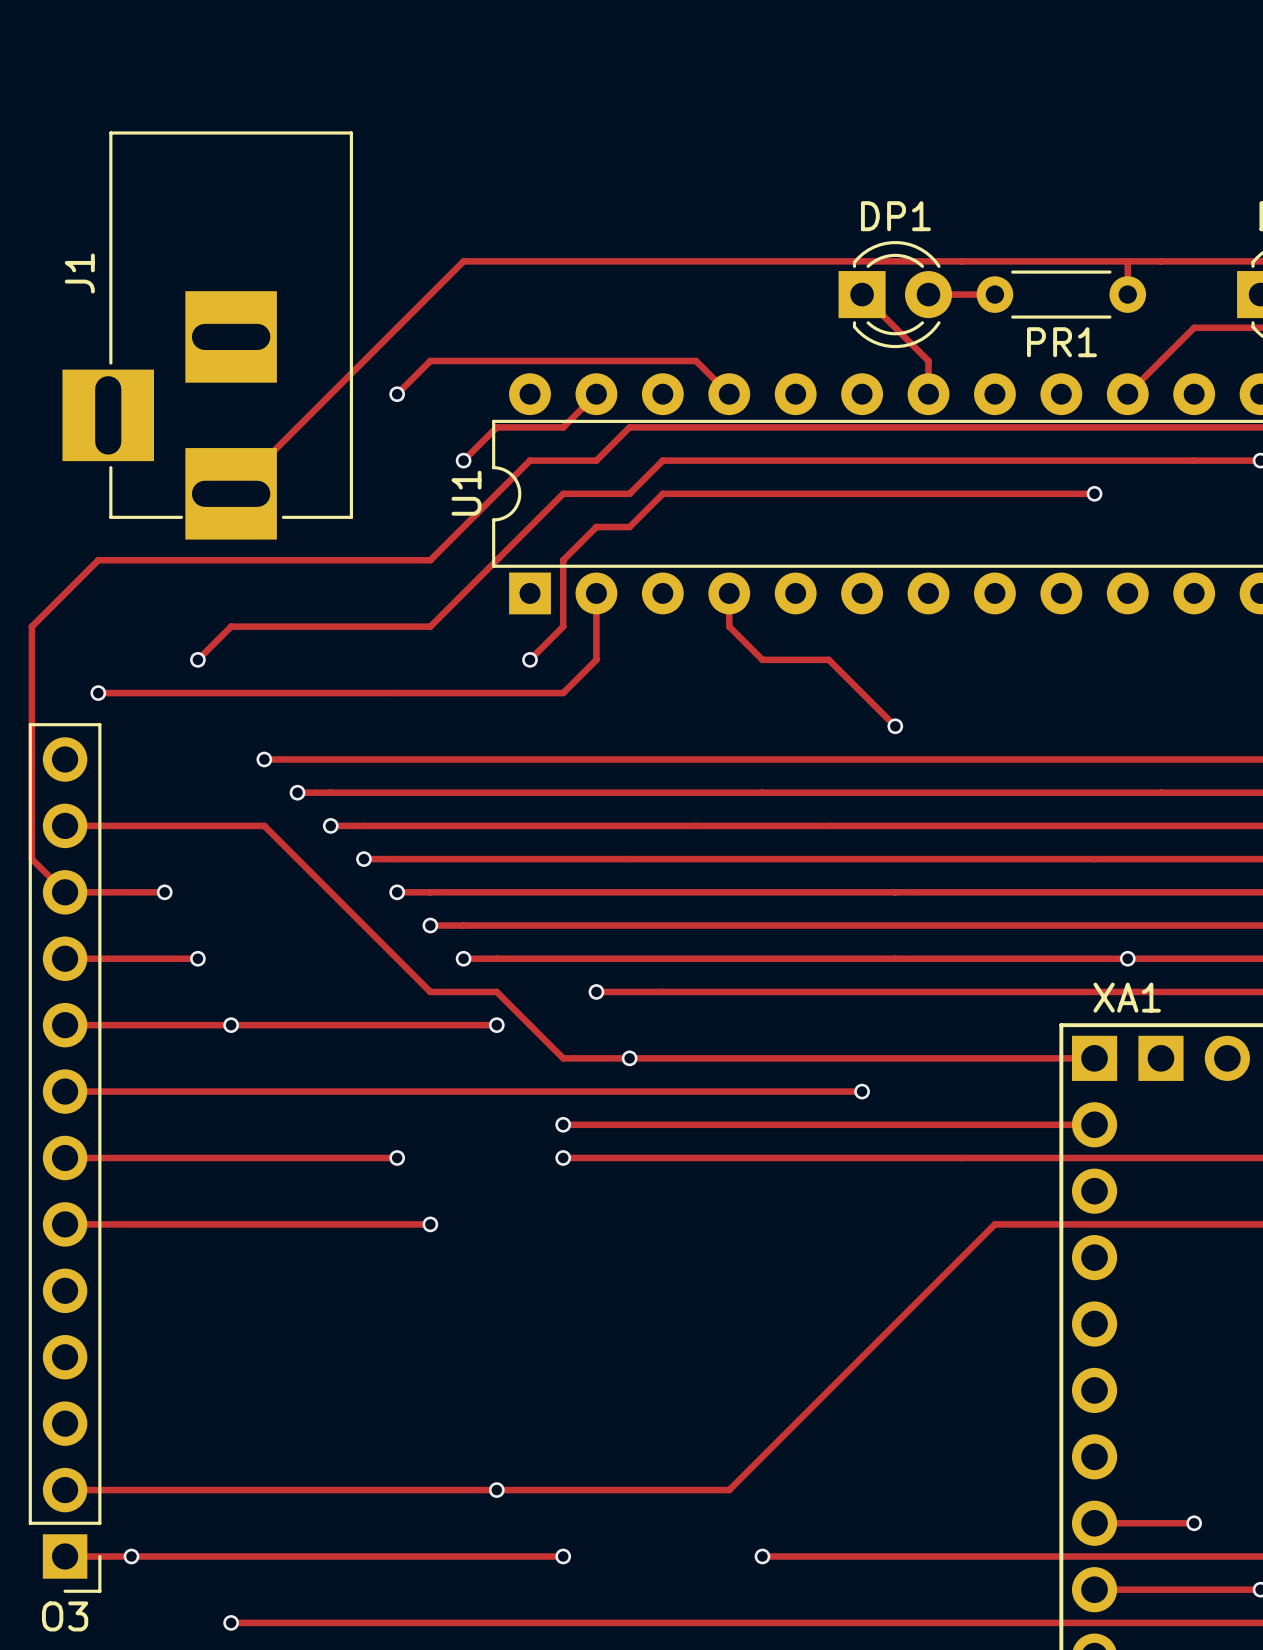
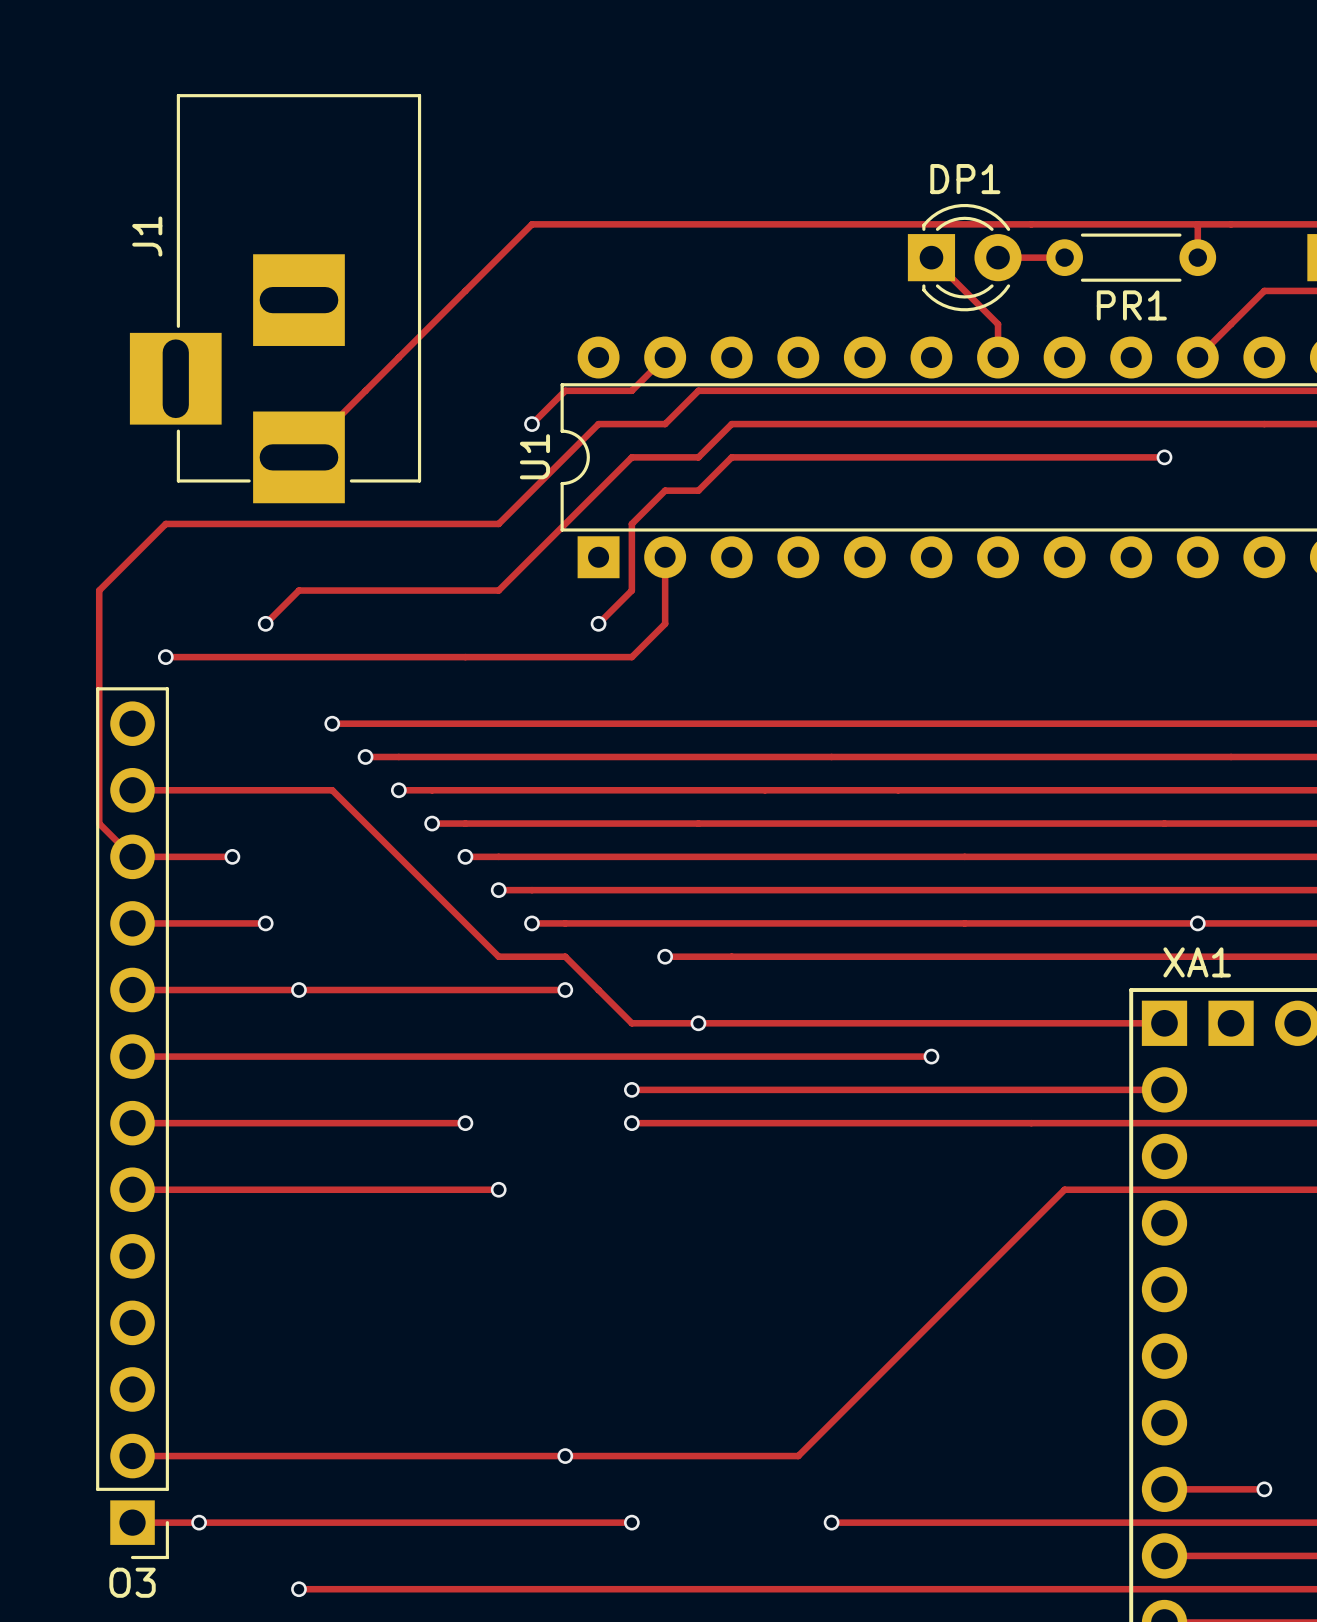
track: (397, 394) (430, 360) (696, 360) (729, 394) -> none
via: (397, 394) -> none
track: (729, 593) (729, 626) (762, 659) (828, 659) (895, 726) -> none
via: (895, 726) -> none

